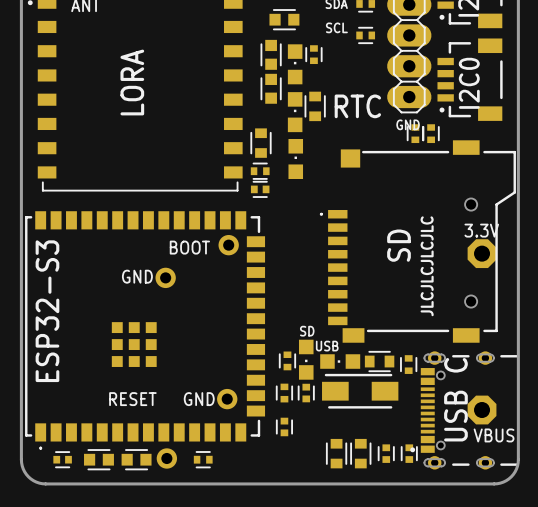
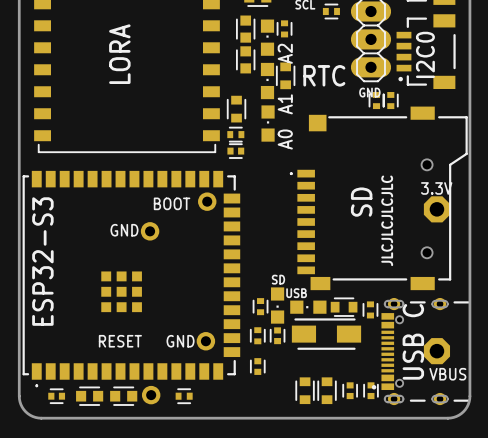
text: none -> A2 (285, 53)
text: none -> A1 (285, 104)
text: none -> A0 (285, 139)

